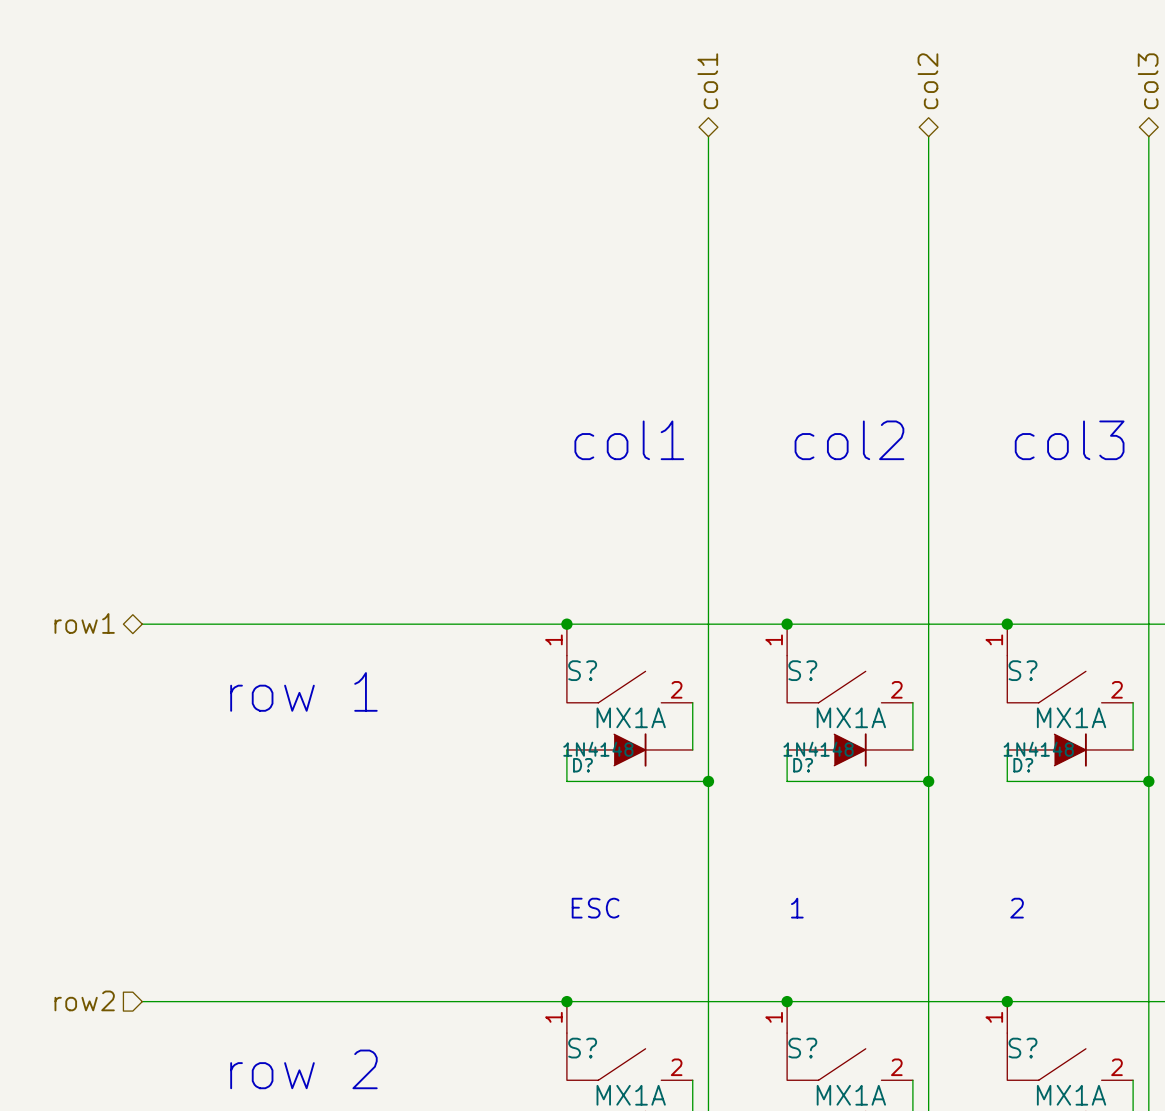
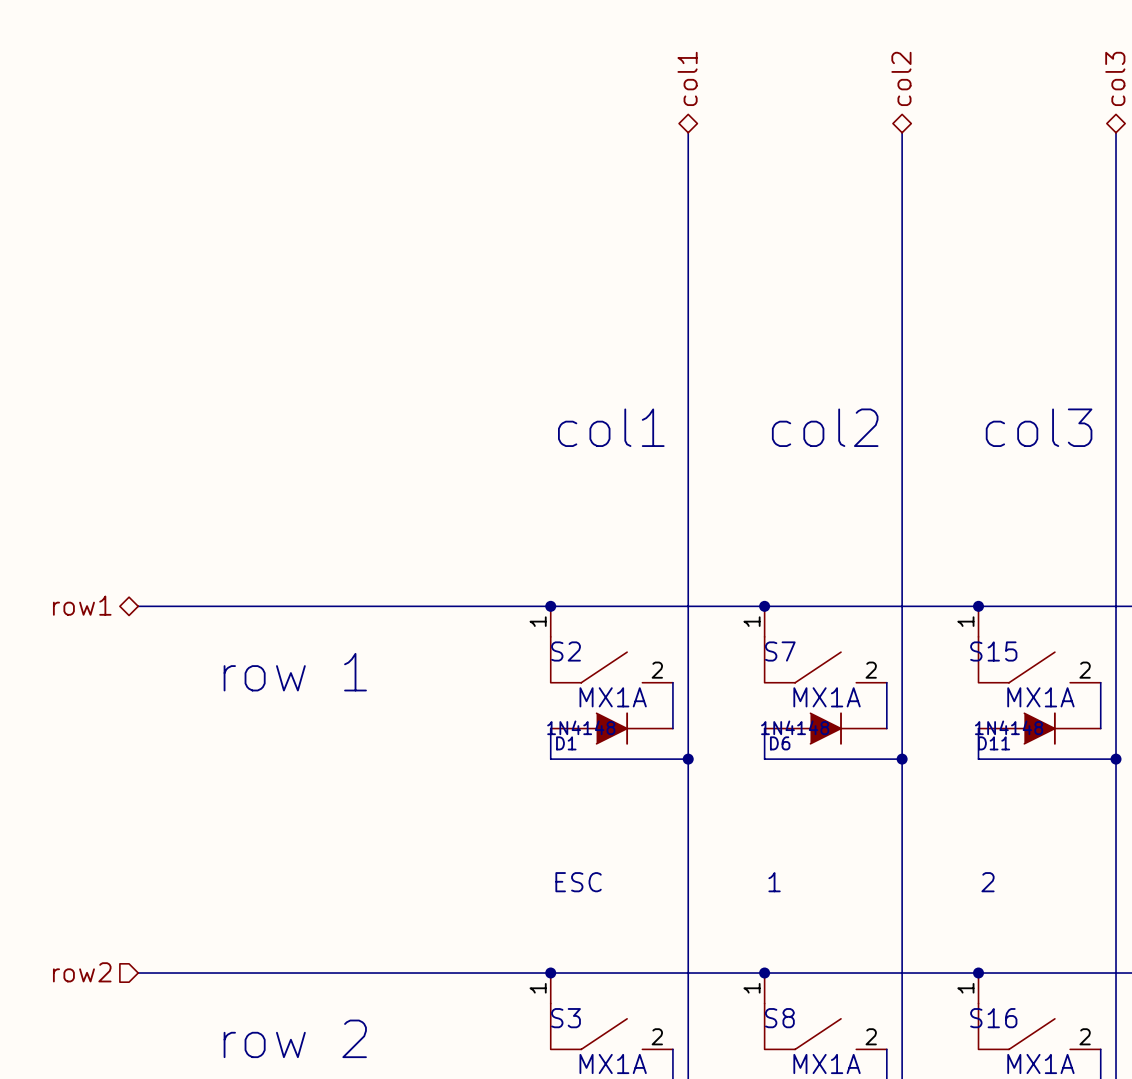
S? name: S? (582, 670) -> S2 (566, 651)
S? name: S? (802, 670) -> S7 (780, 651)
S? name: S? (1023, 670) -> S15 (993, 651)
D? name: D? (582, 765) -> D1 (566, 743)
D? name: D? (803, 765) -> D6 (780, 743)
D? name: D? (1023, 765) -> D11 (994, 743)
S? name: S? (582, 1048) -> S3 (566, 1018)
S? name: S? (802, 1048) -> S8 (779, 1018)
S? name: S? (1023, 1048) -> S16 (993, 1018)

